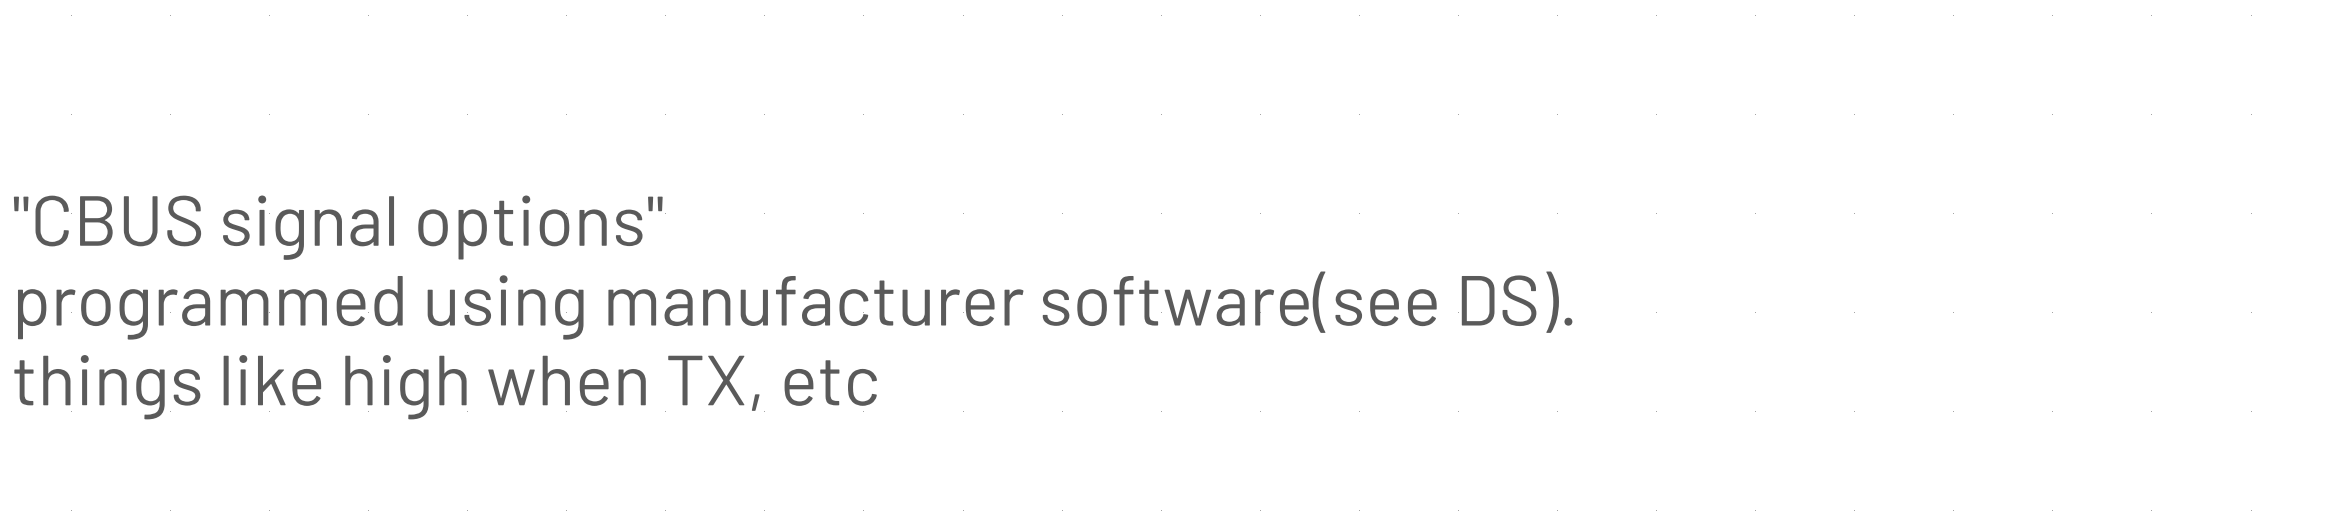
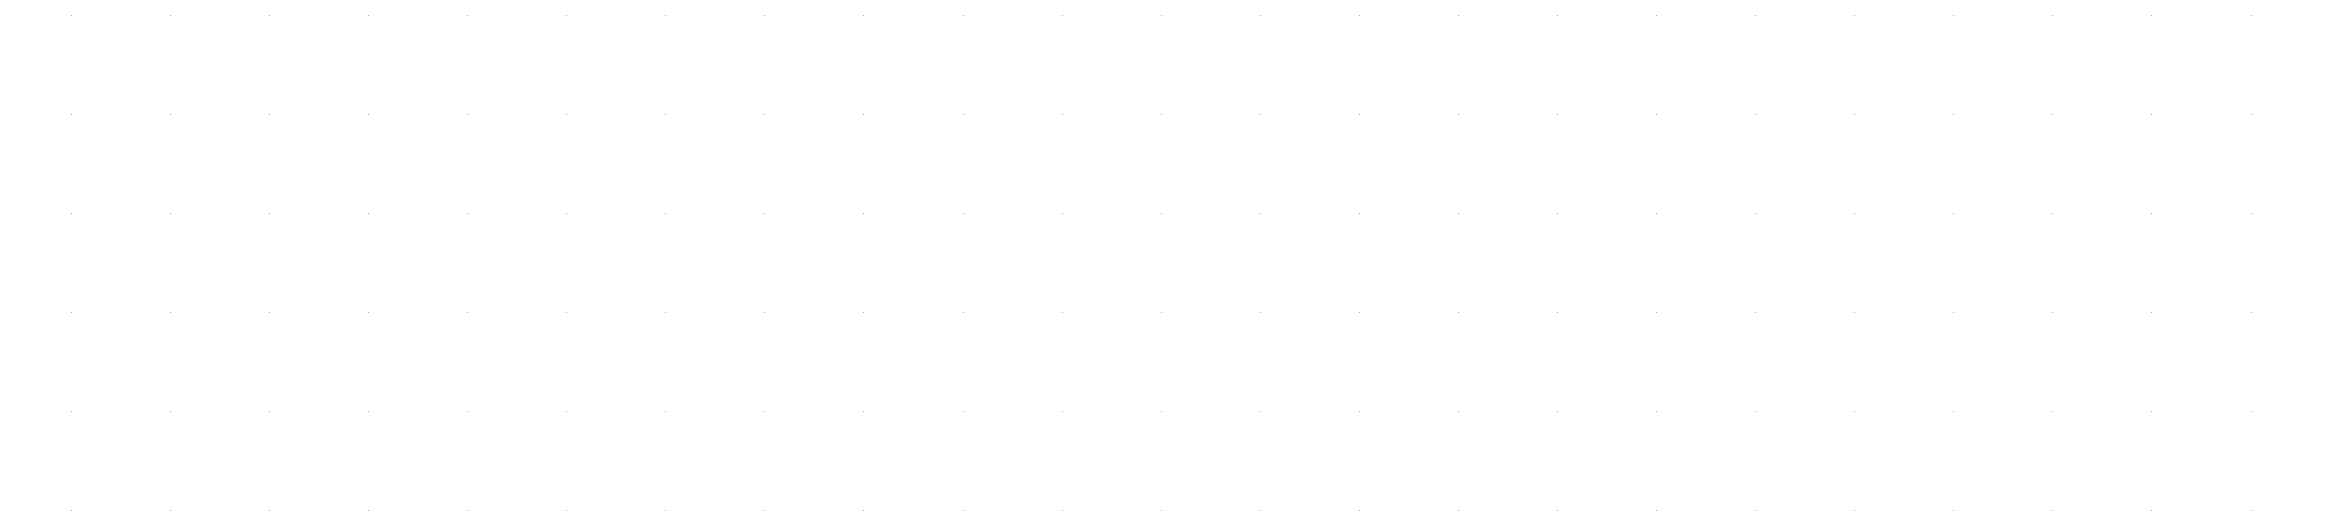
text: "CBUS signal options" (338, 227) -> none
text: programmed using manufacturer software(see DS). (795, 305) -> none
text: things like high when TX, etc (445, 387) -> none

